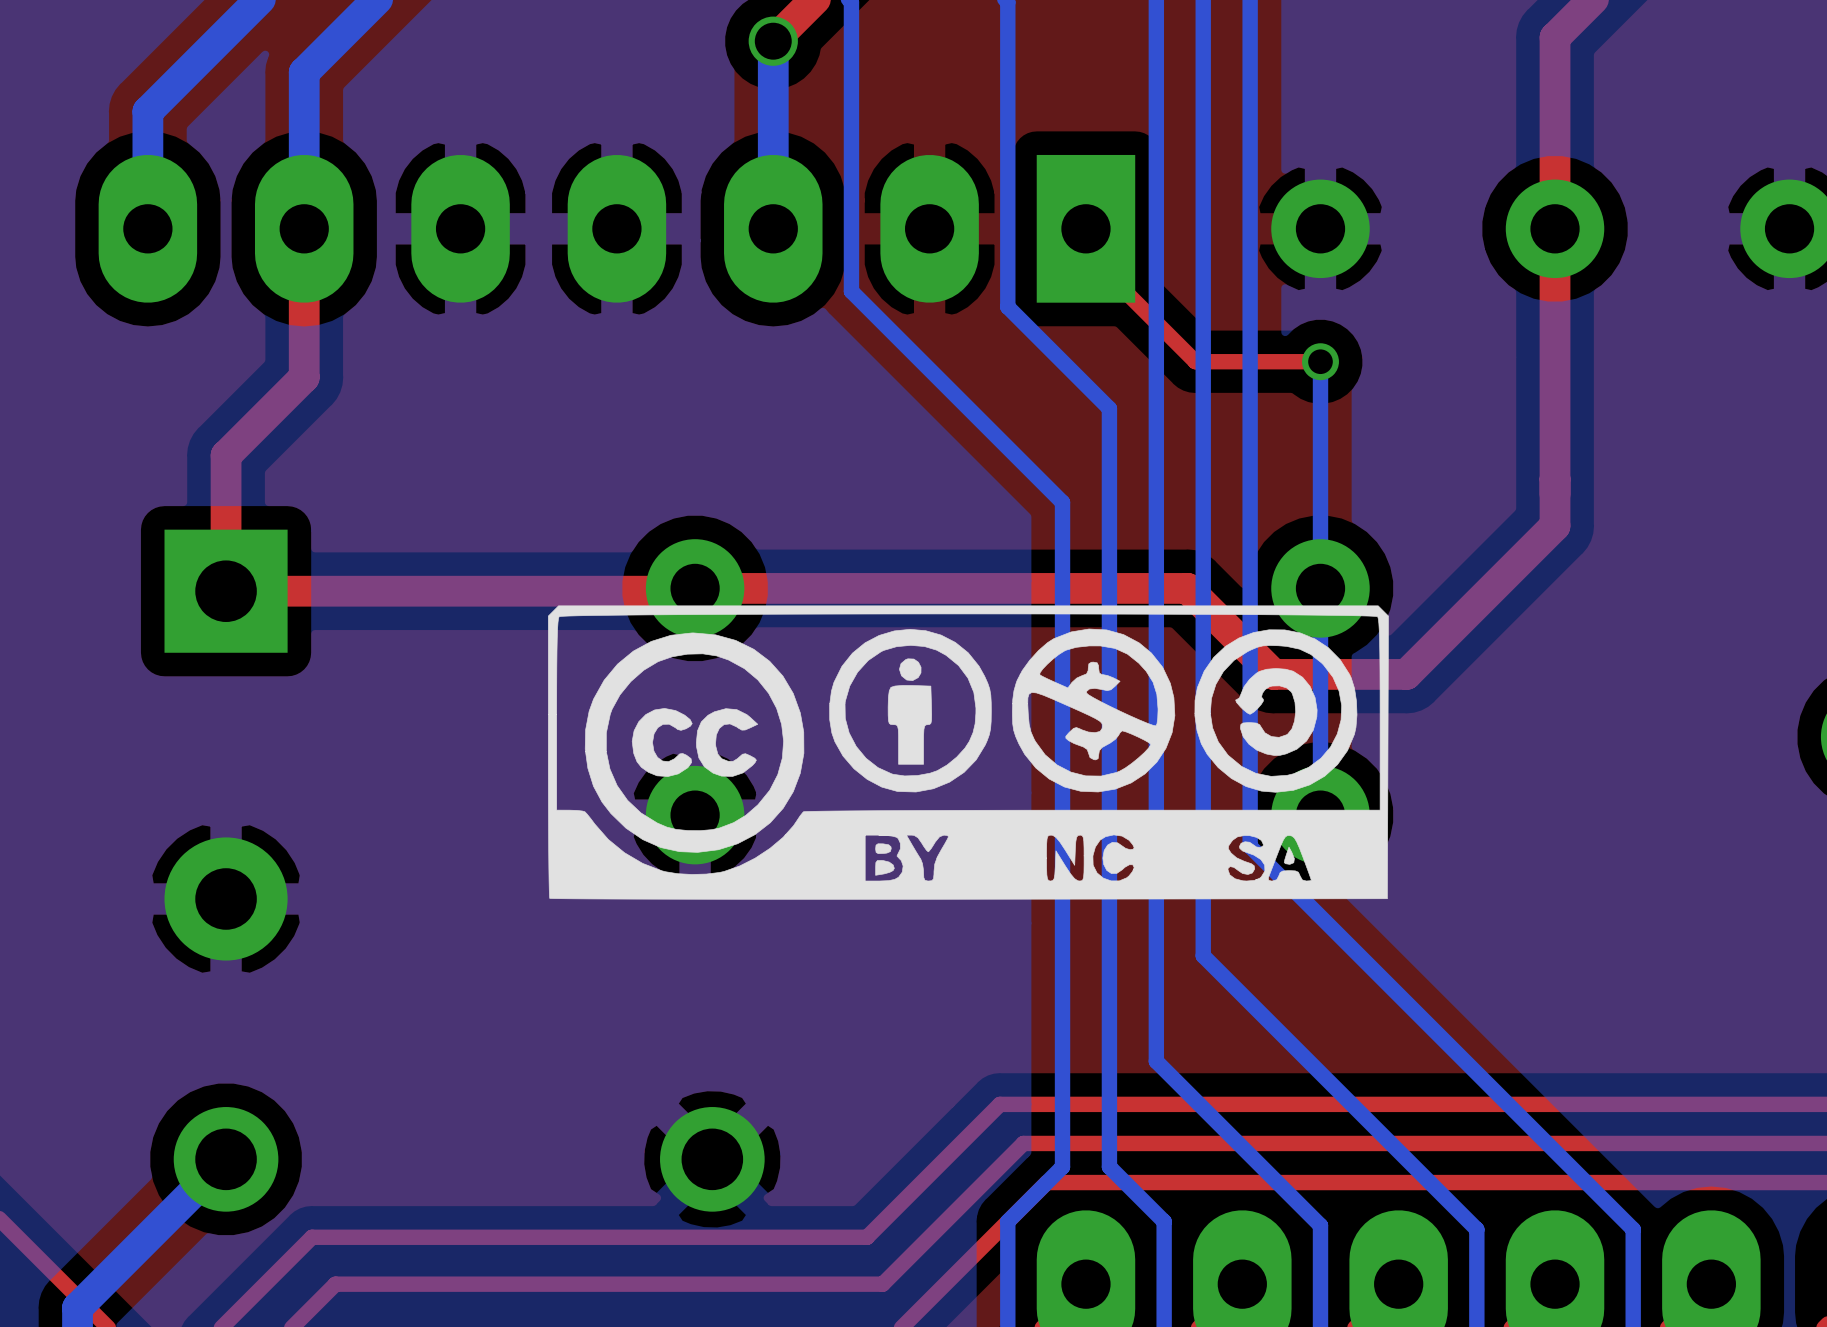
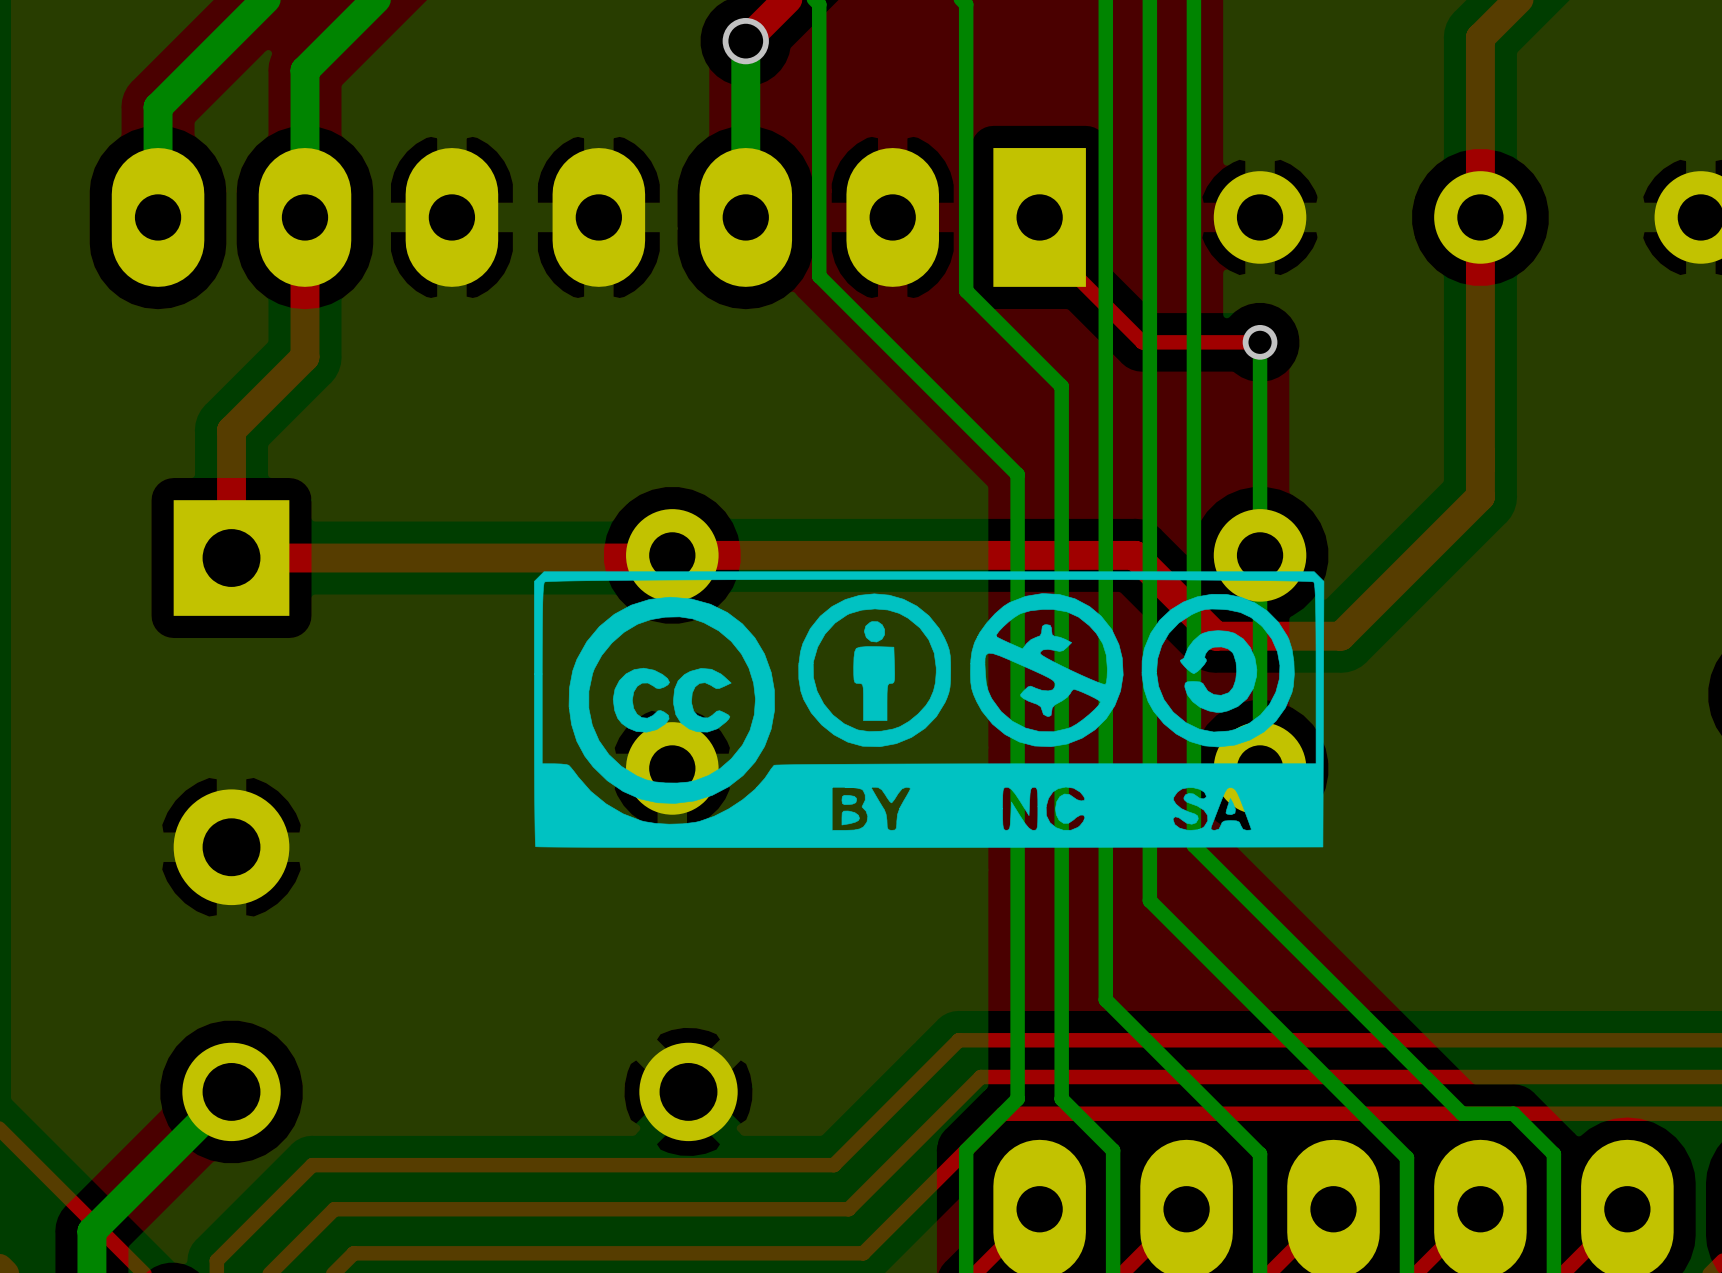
bottom track: (1250, 846) (1633, 1229) -> (1193, 797) (1193, 845) (1462, 1113) (1513, 1113) (1553, 1154) (1553, 1157)

